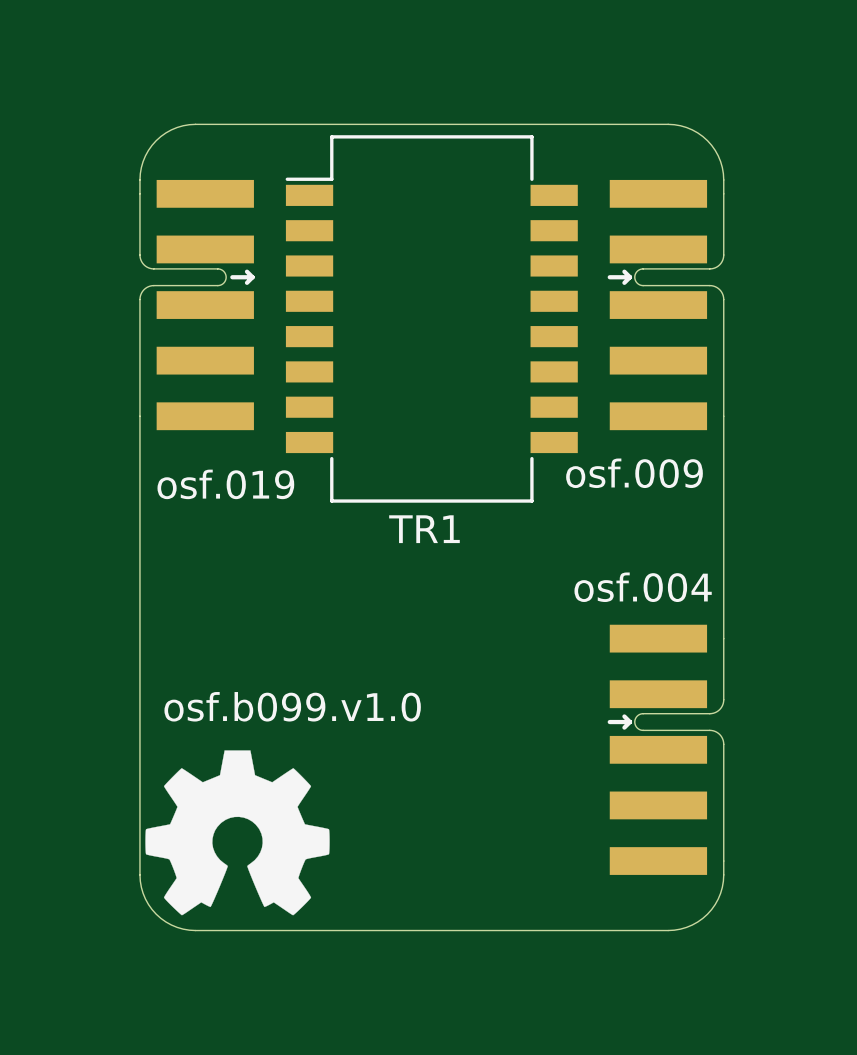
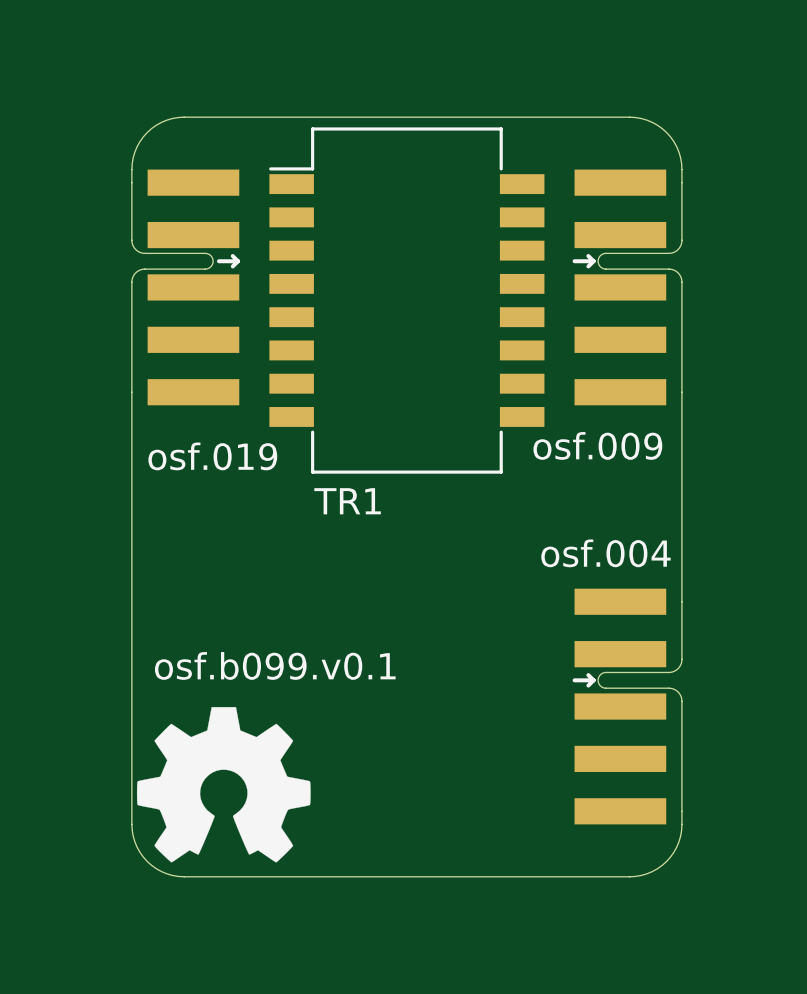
TR1 name position: TR1 (424, 529) -> TR1 (347, 501)
text: osf.b099.v1.0 (292, 706) -> osf.b099.v0.1 (275, 665)

